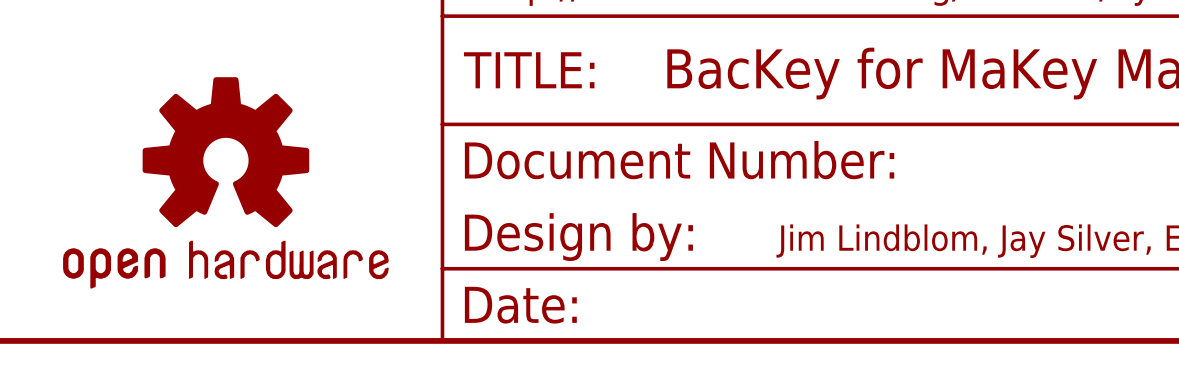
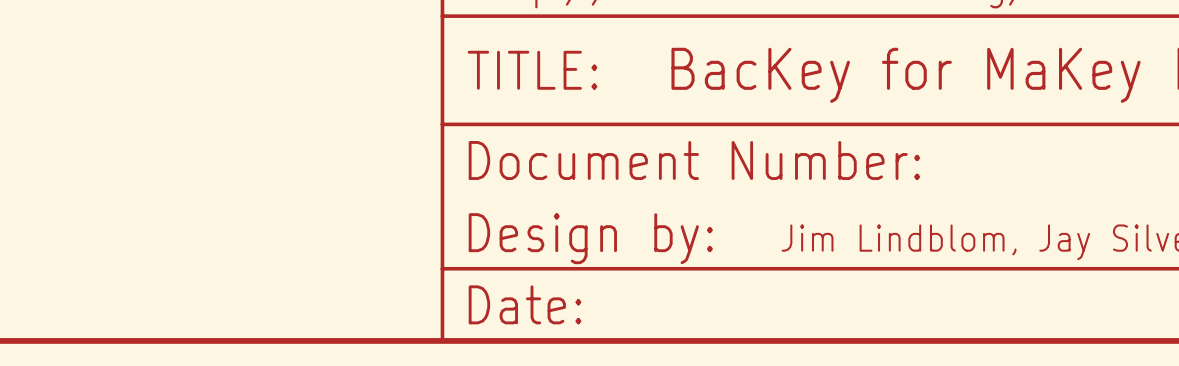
part: (225, 182) -> none

